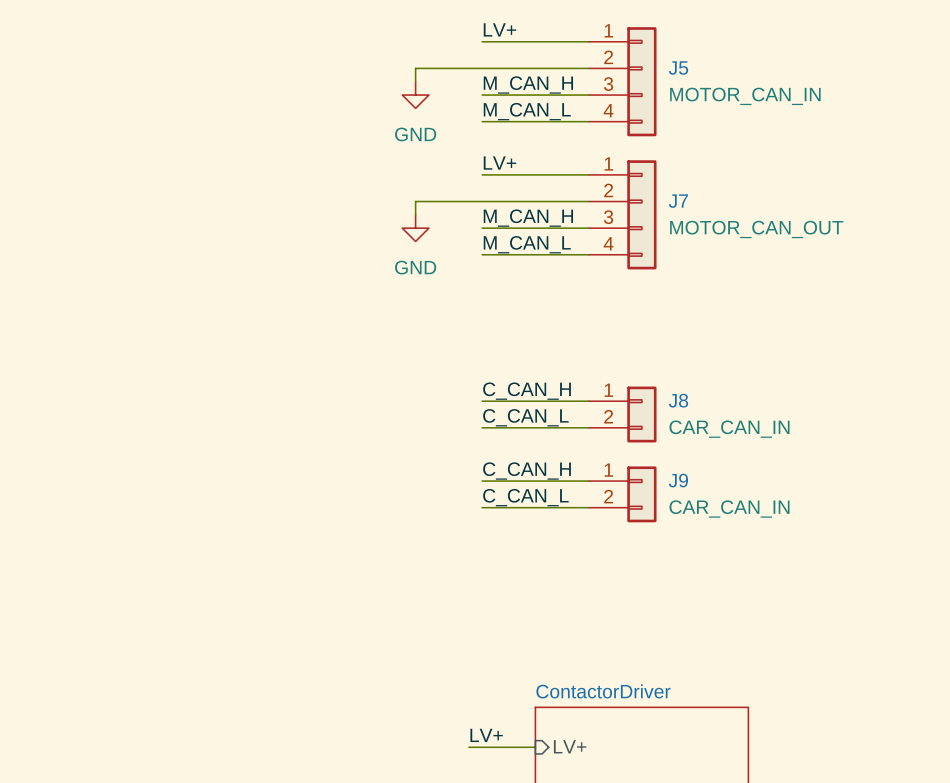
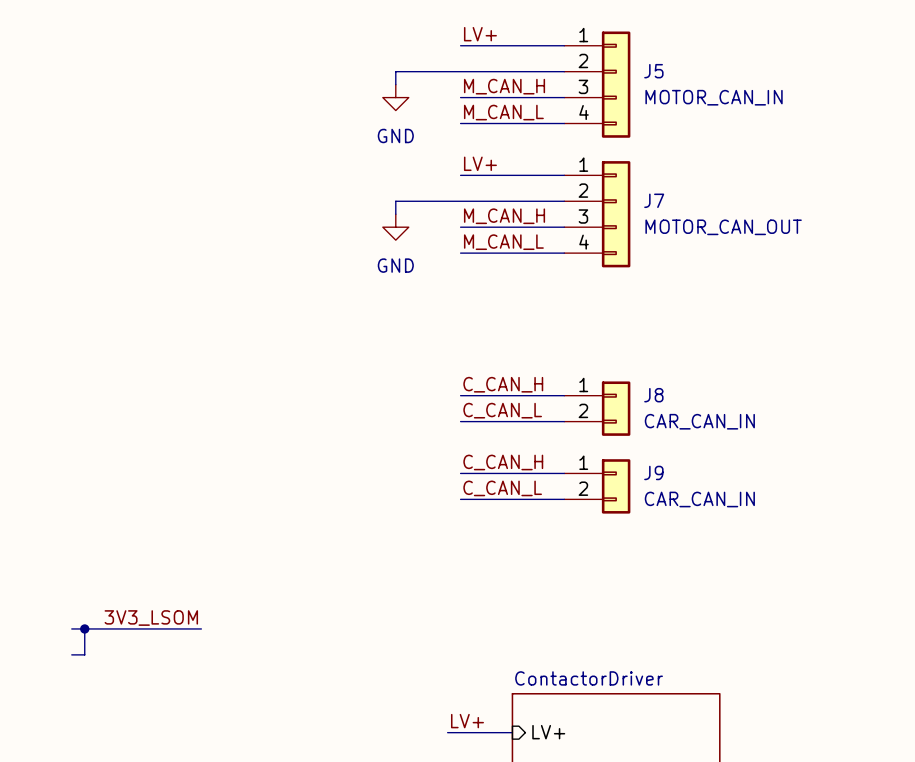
label: none -> 3V3_LSOM (151, 618)
wire: none -> (71, 628) (201, 628)
wire: none -> (84, 628) (84, 654) (71, 654)
junction: none -> (84, 628)

